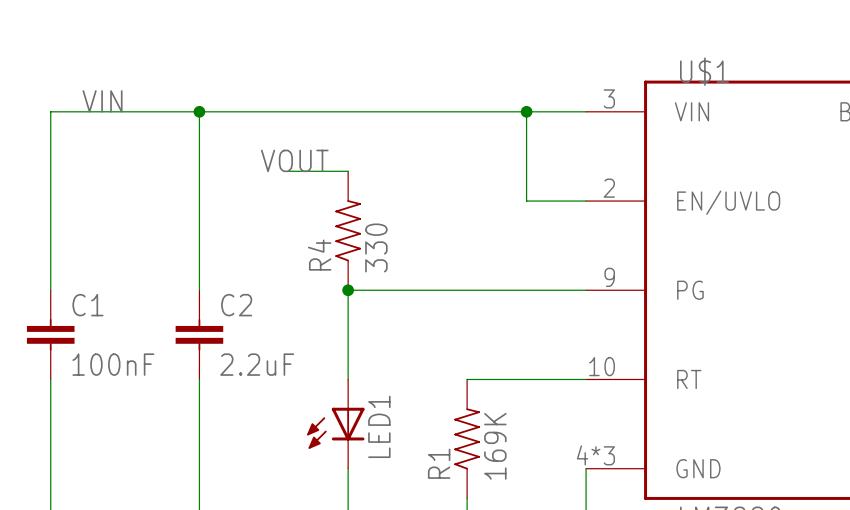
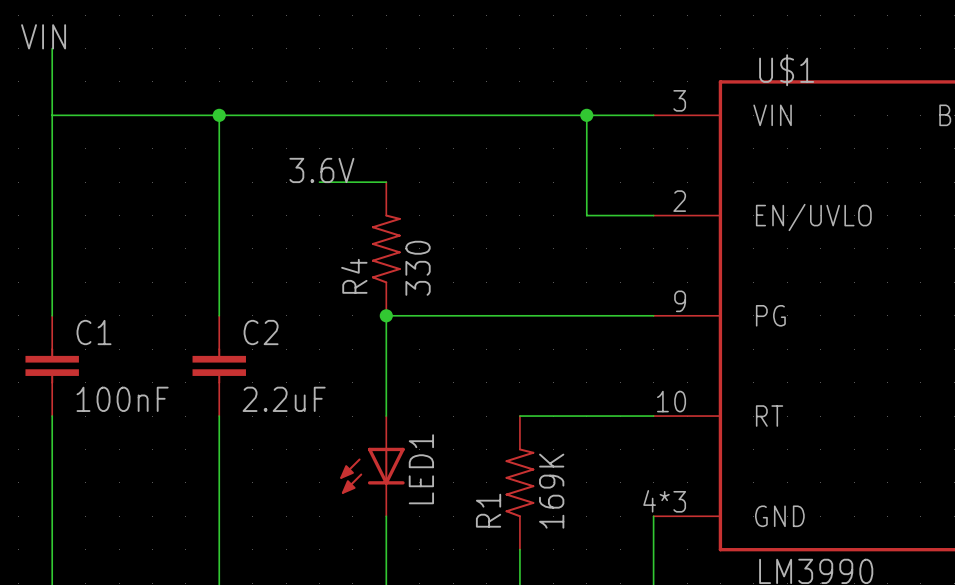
wire: none -> (52, 48) (52, 115)
label position: VIN (102, 101) -> VIN (43, 36)
label: VOUT (294, 160) -> 3.6V (321, 170)

